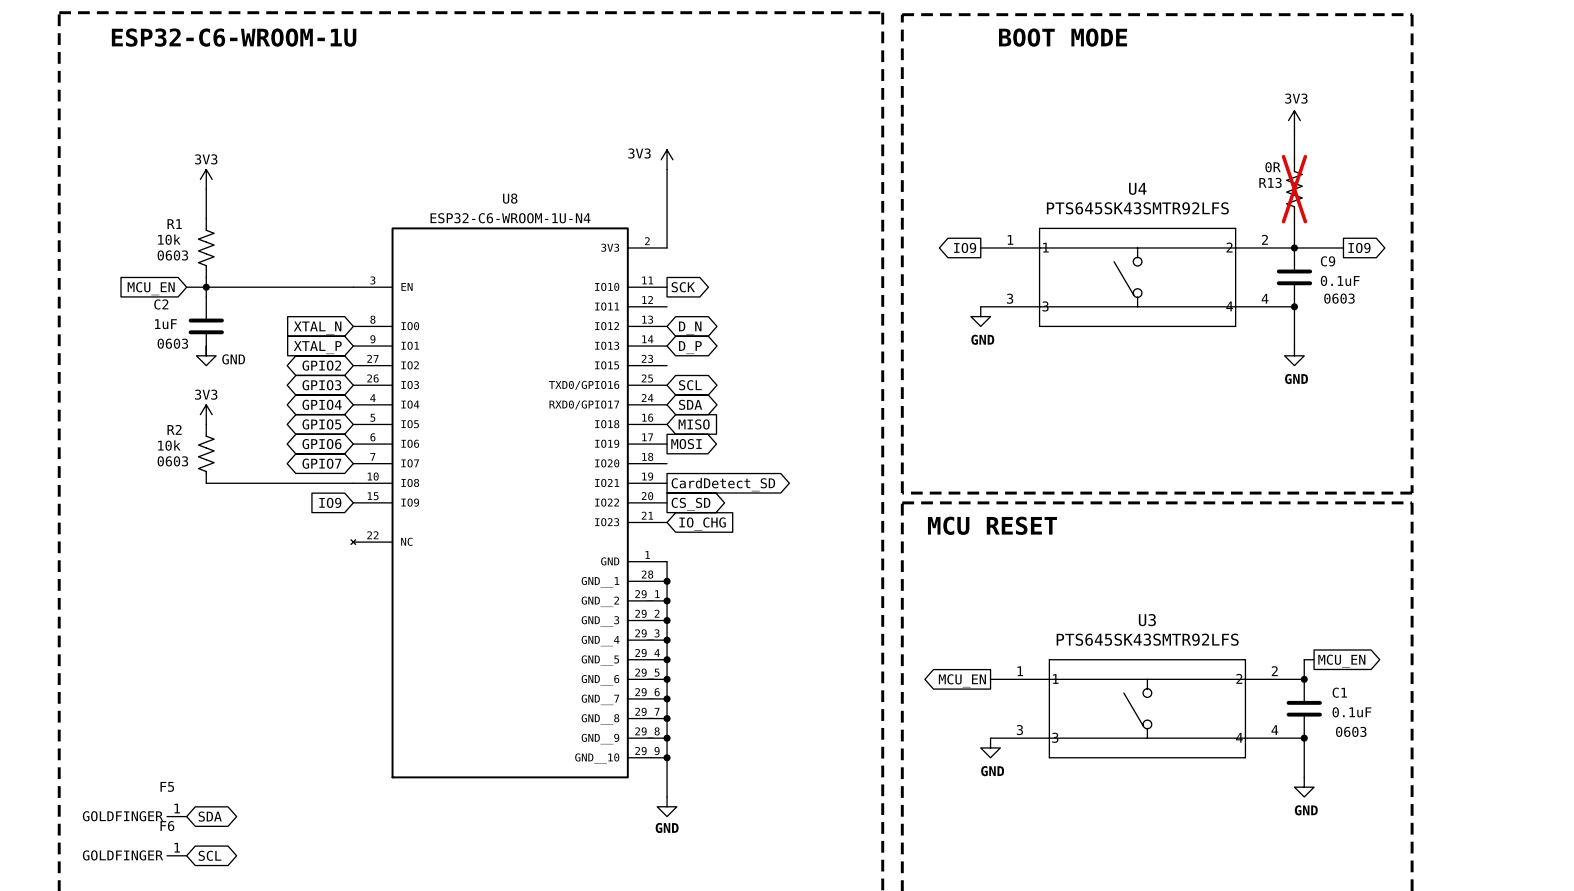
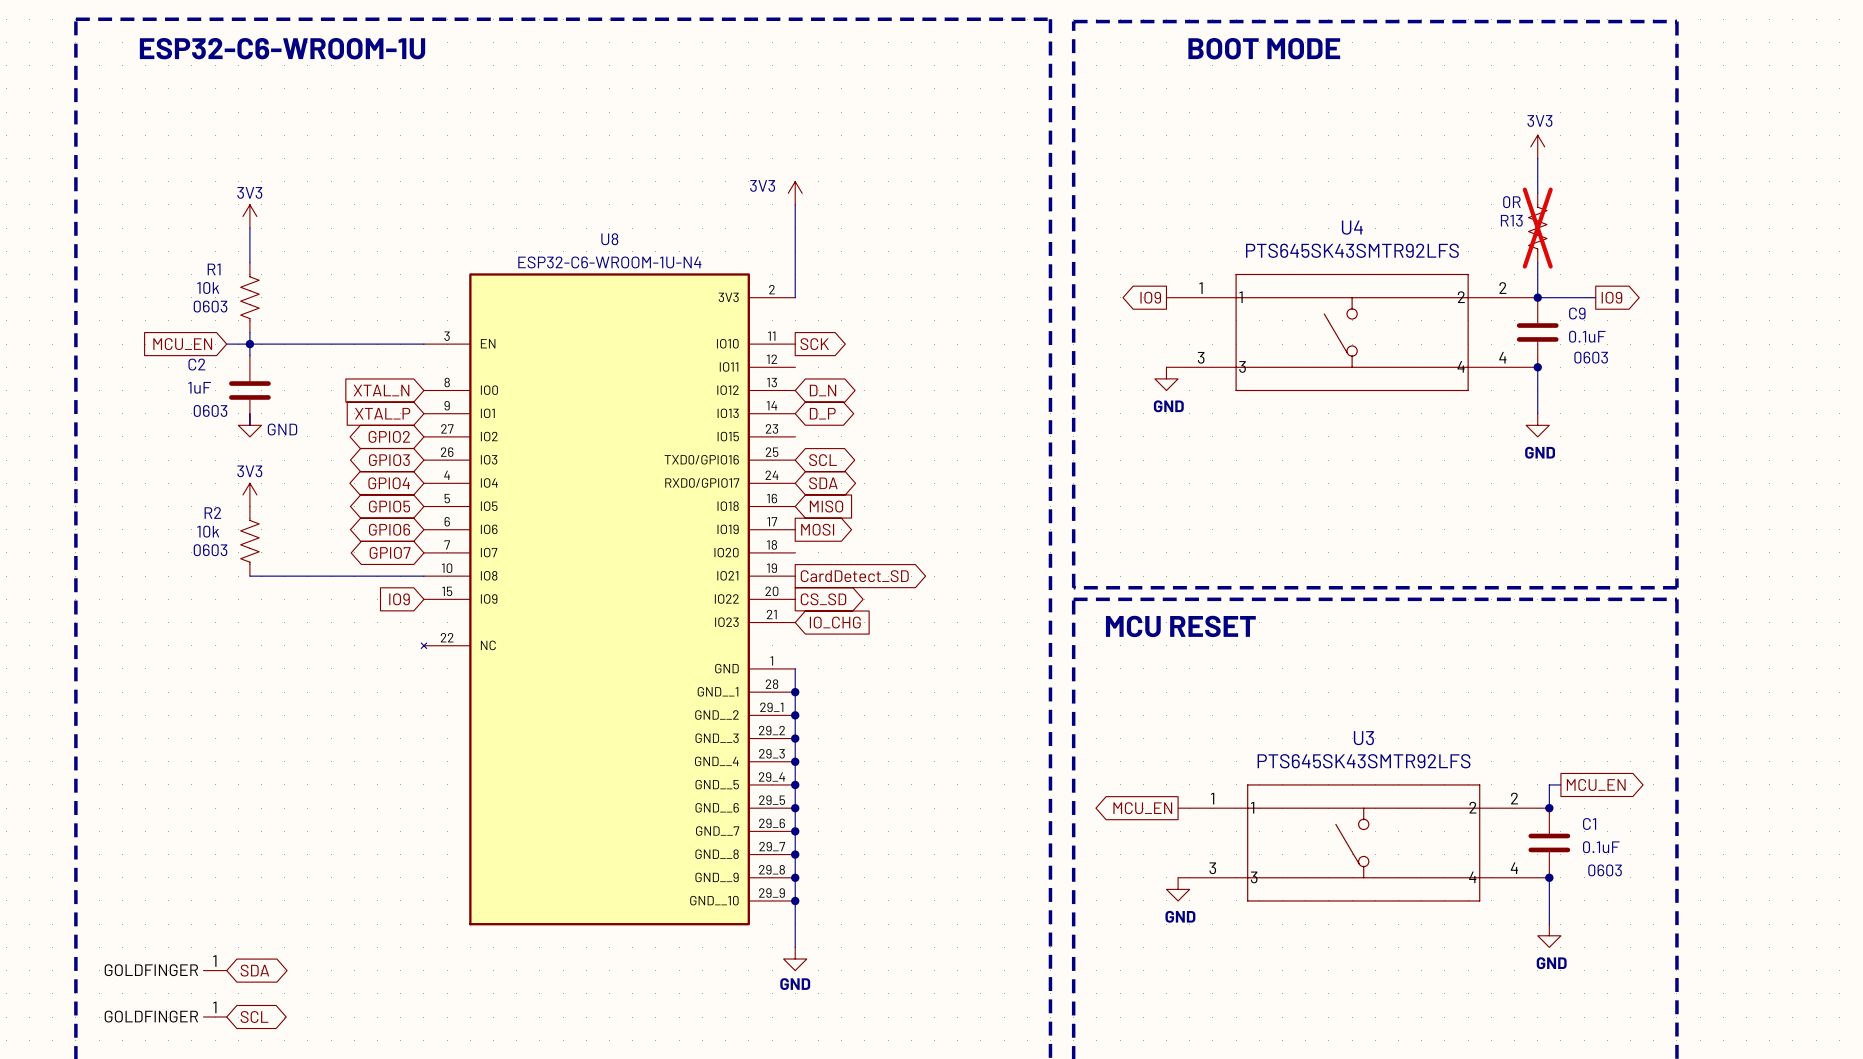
F5 name: F5 (167, 786) -> none
F6 name: F6 (167, 826) -> none

